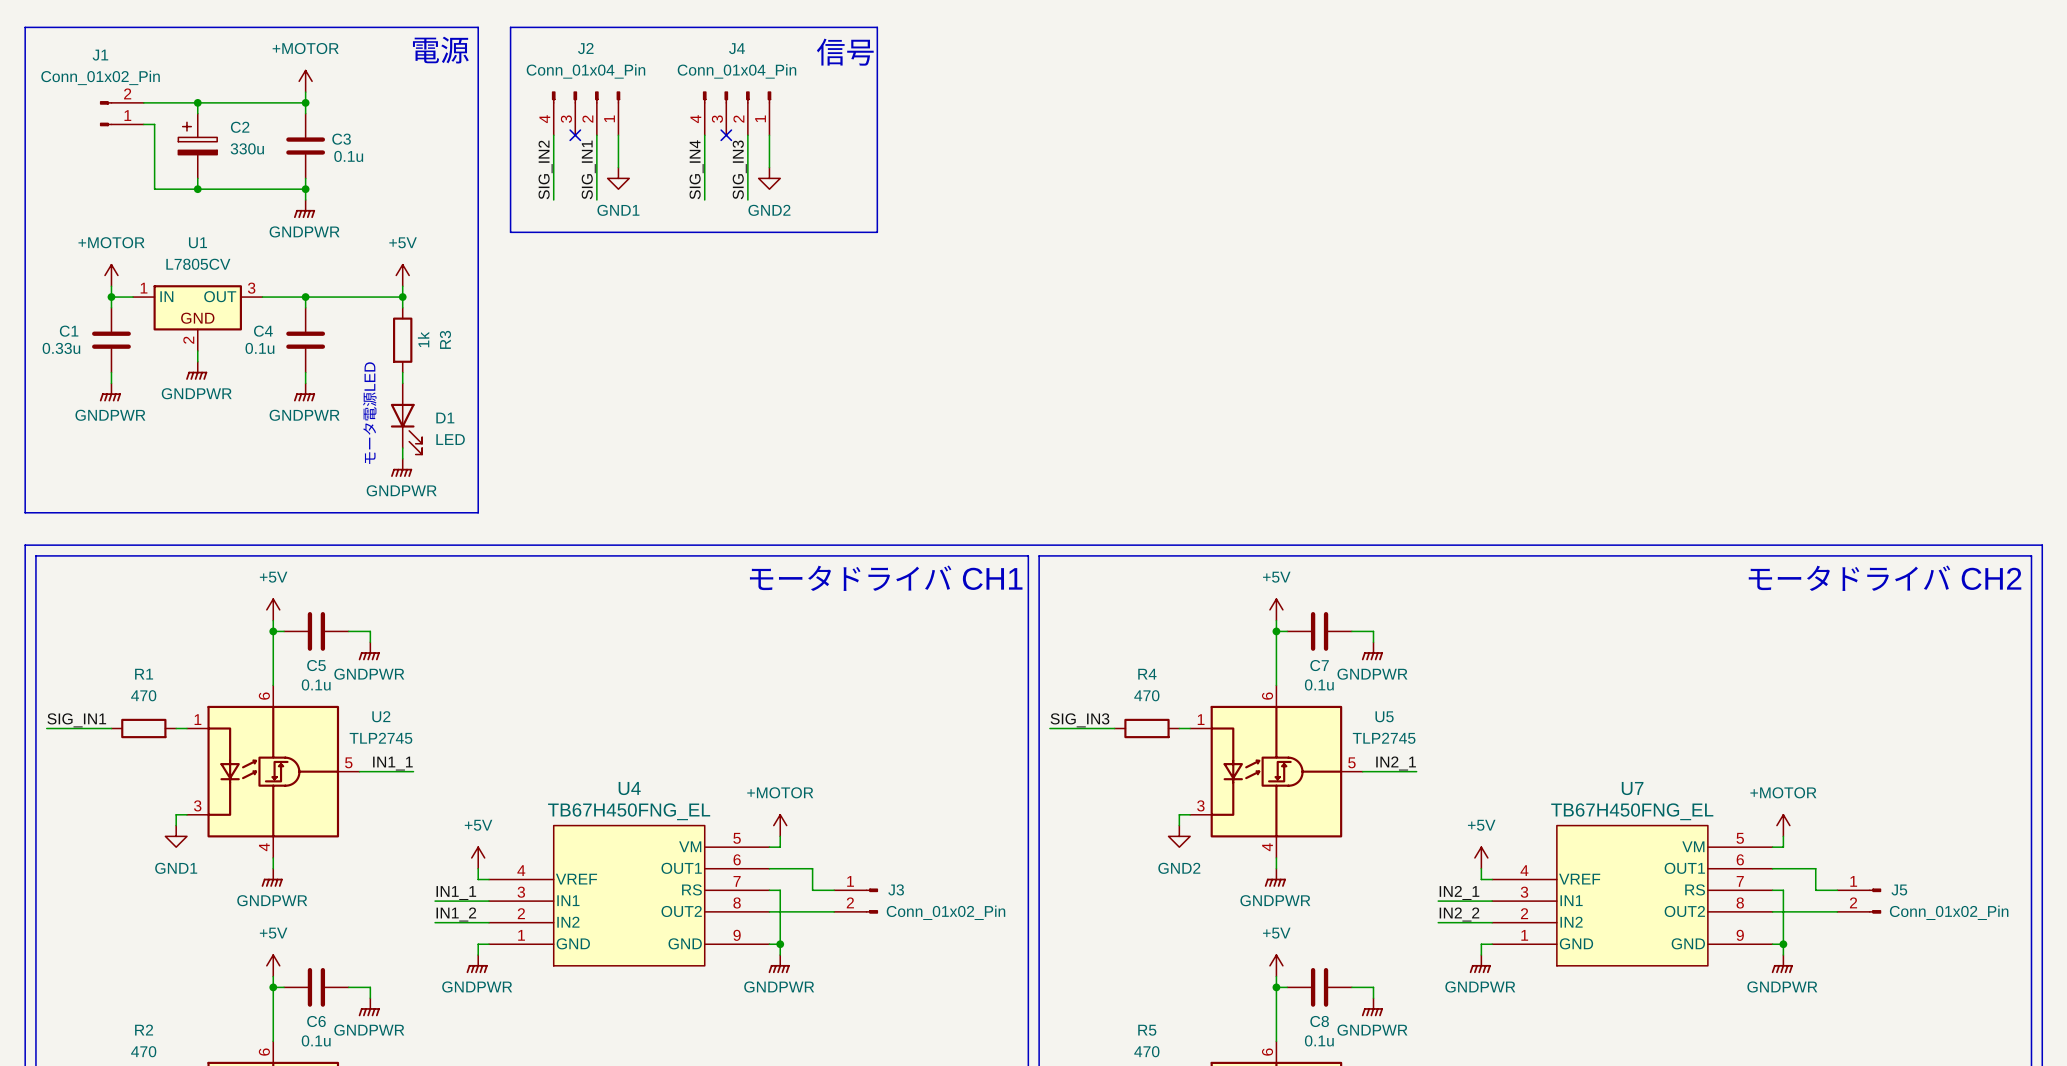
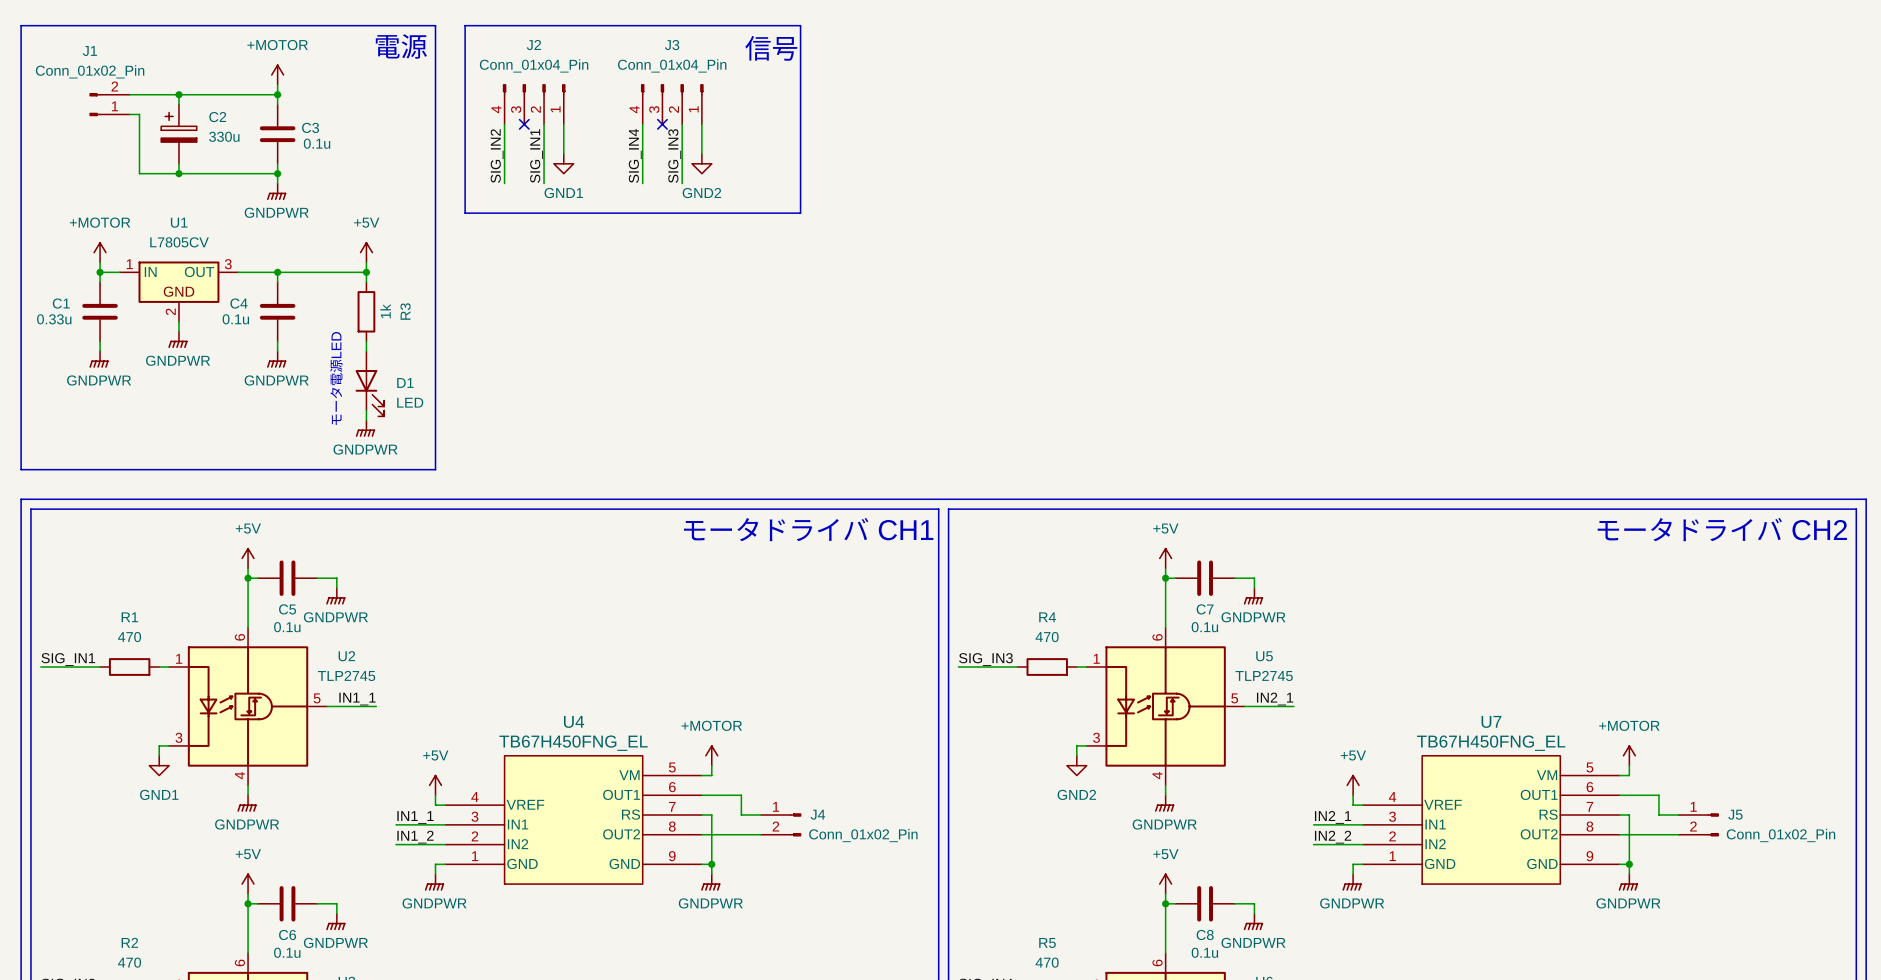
J4 name: J4 (736, 48) -> J3 (672, 45)
J3 name: J3 (896, 889) -> J4 (817, 814)

